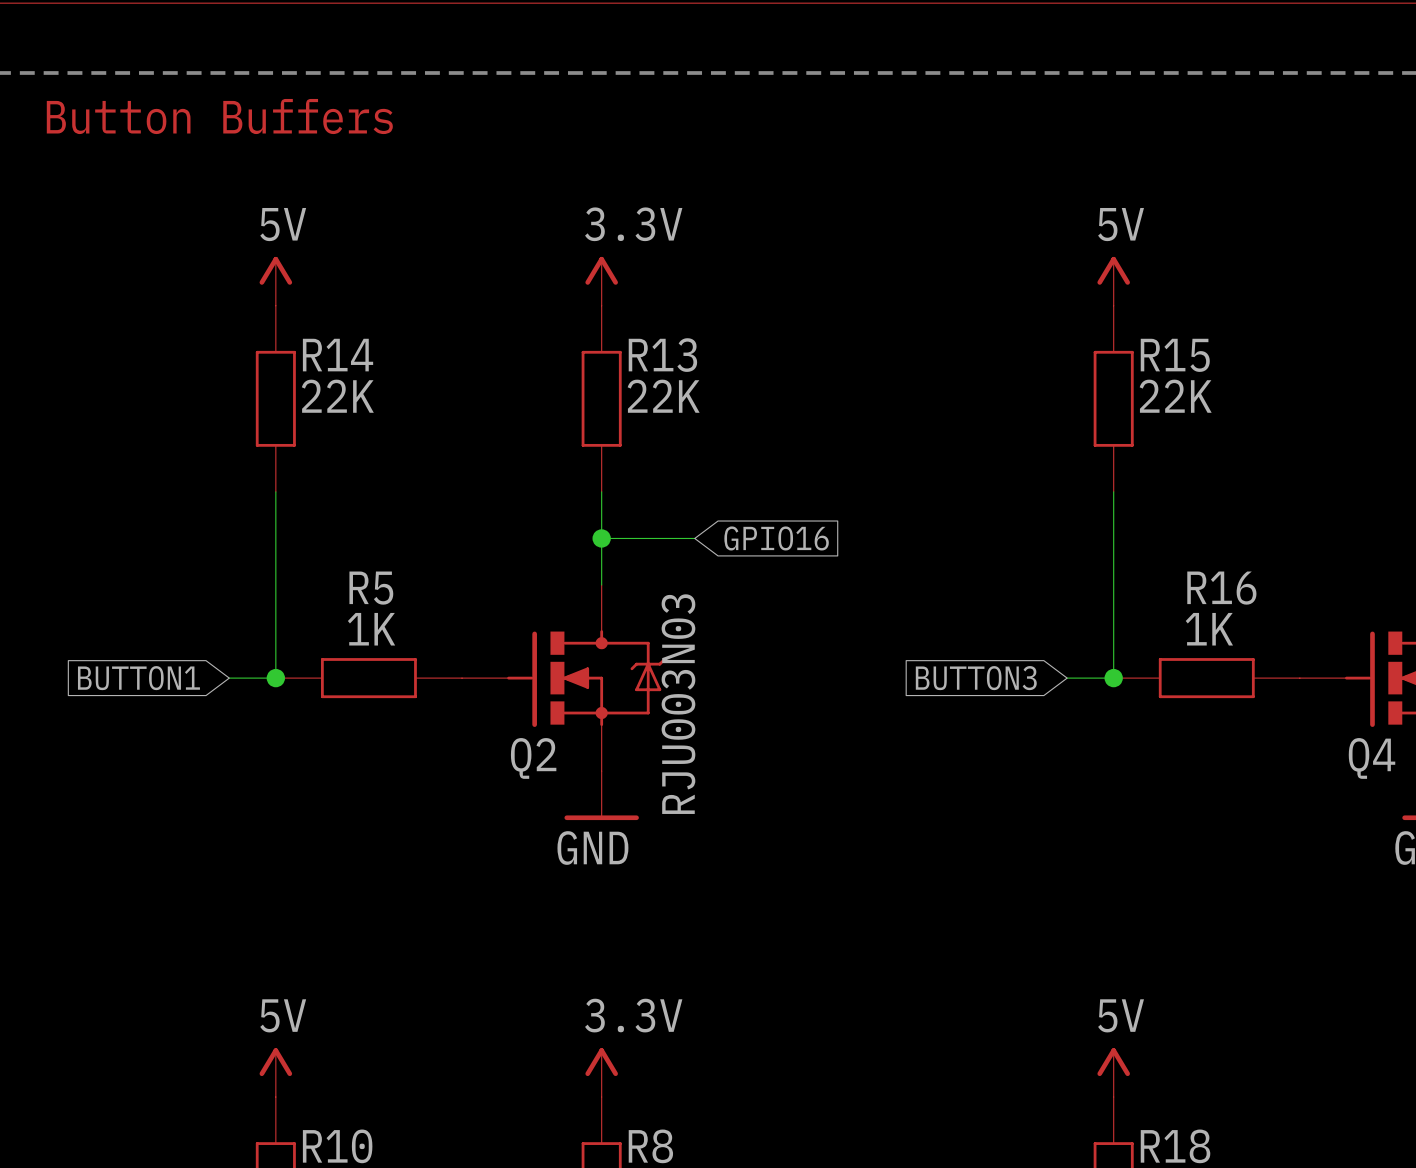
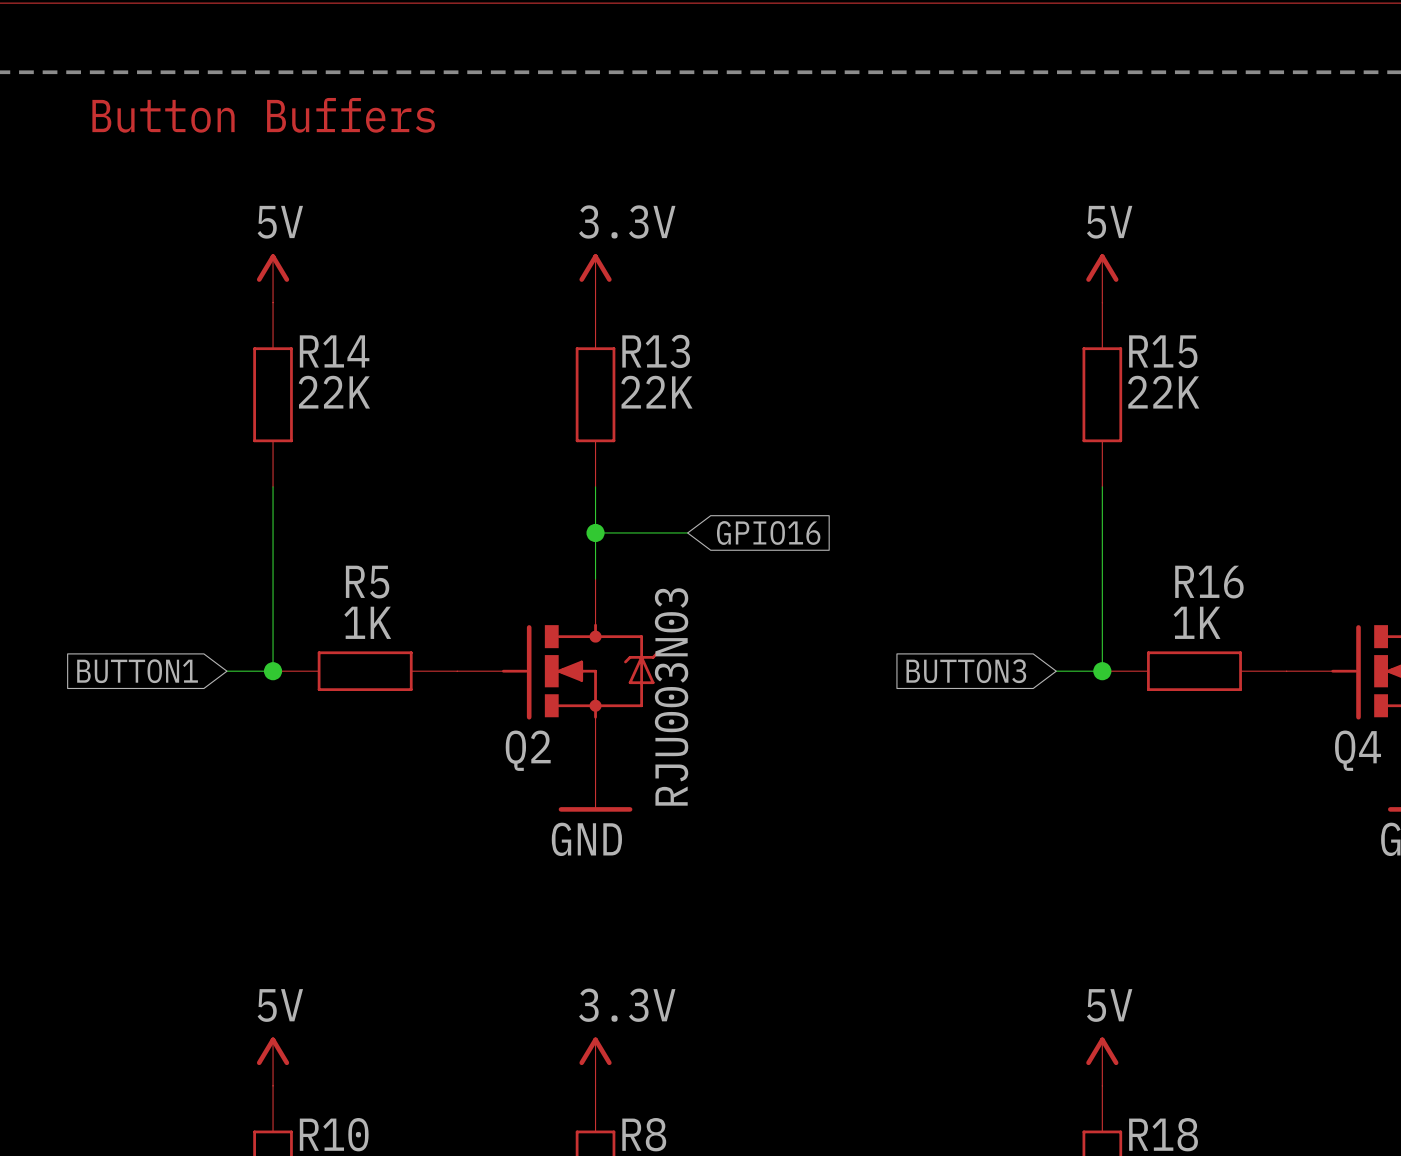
text position: Button Buffers (219, 116) -> Button Buffers (263, 115)

